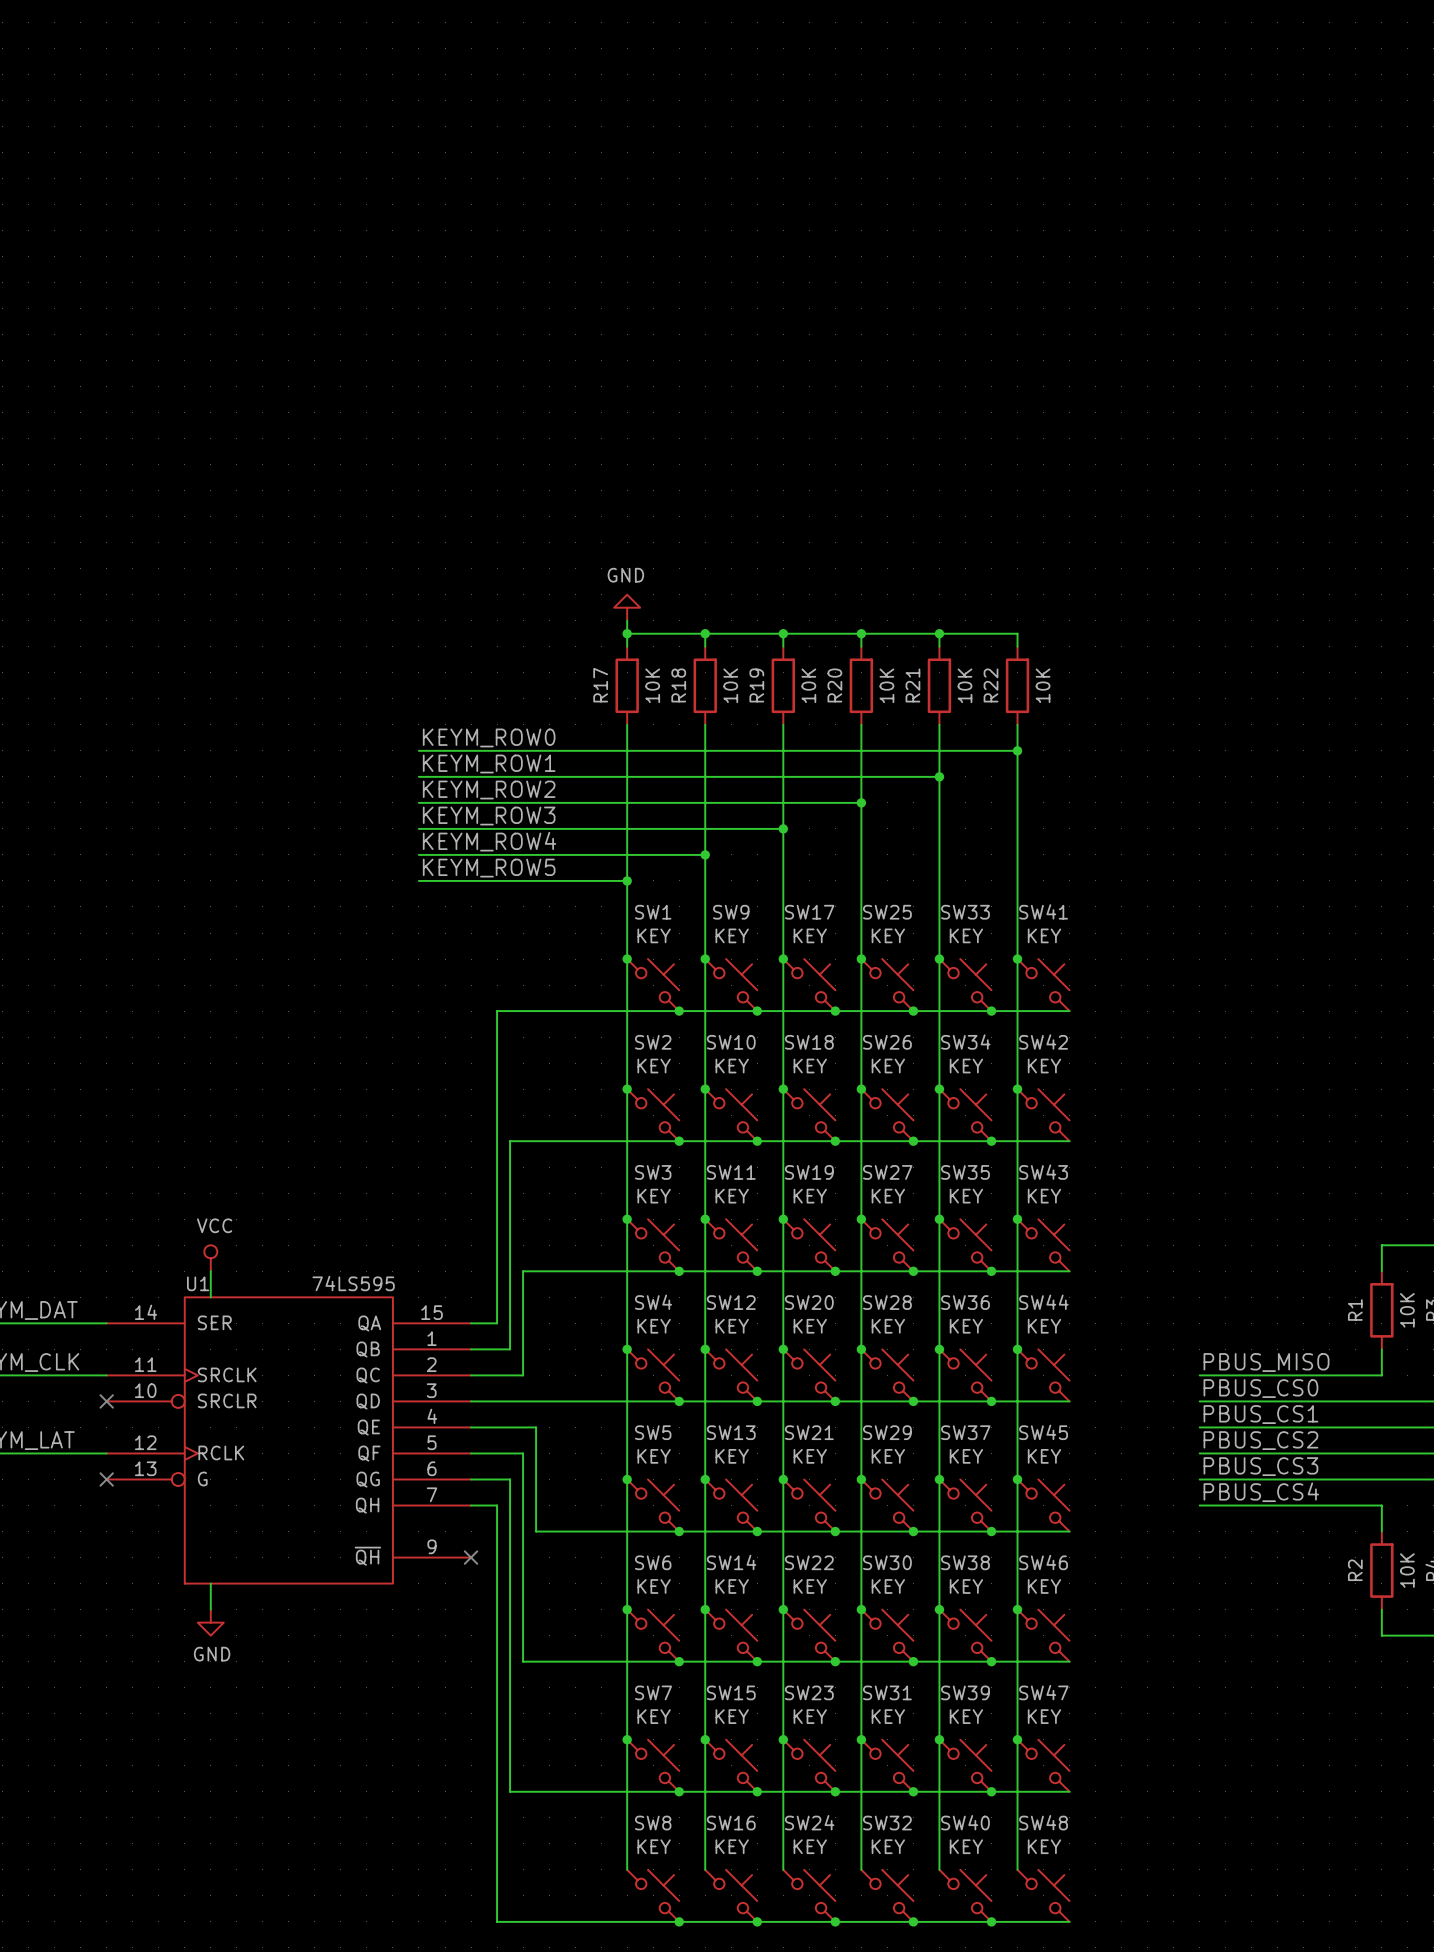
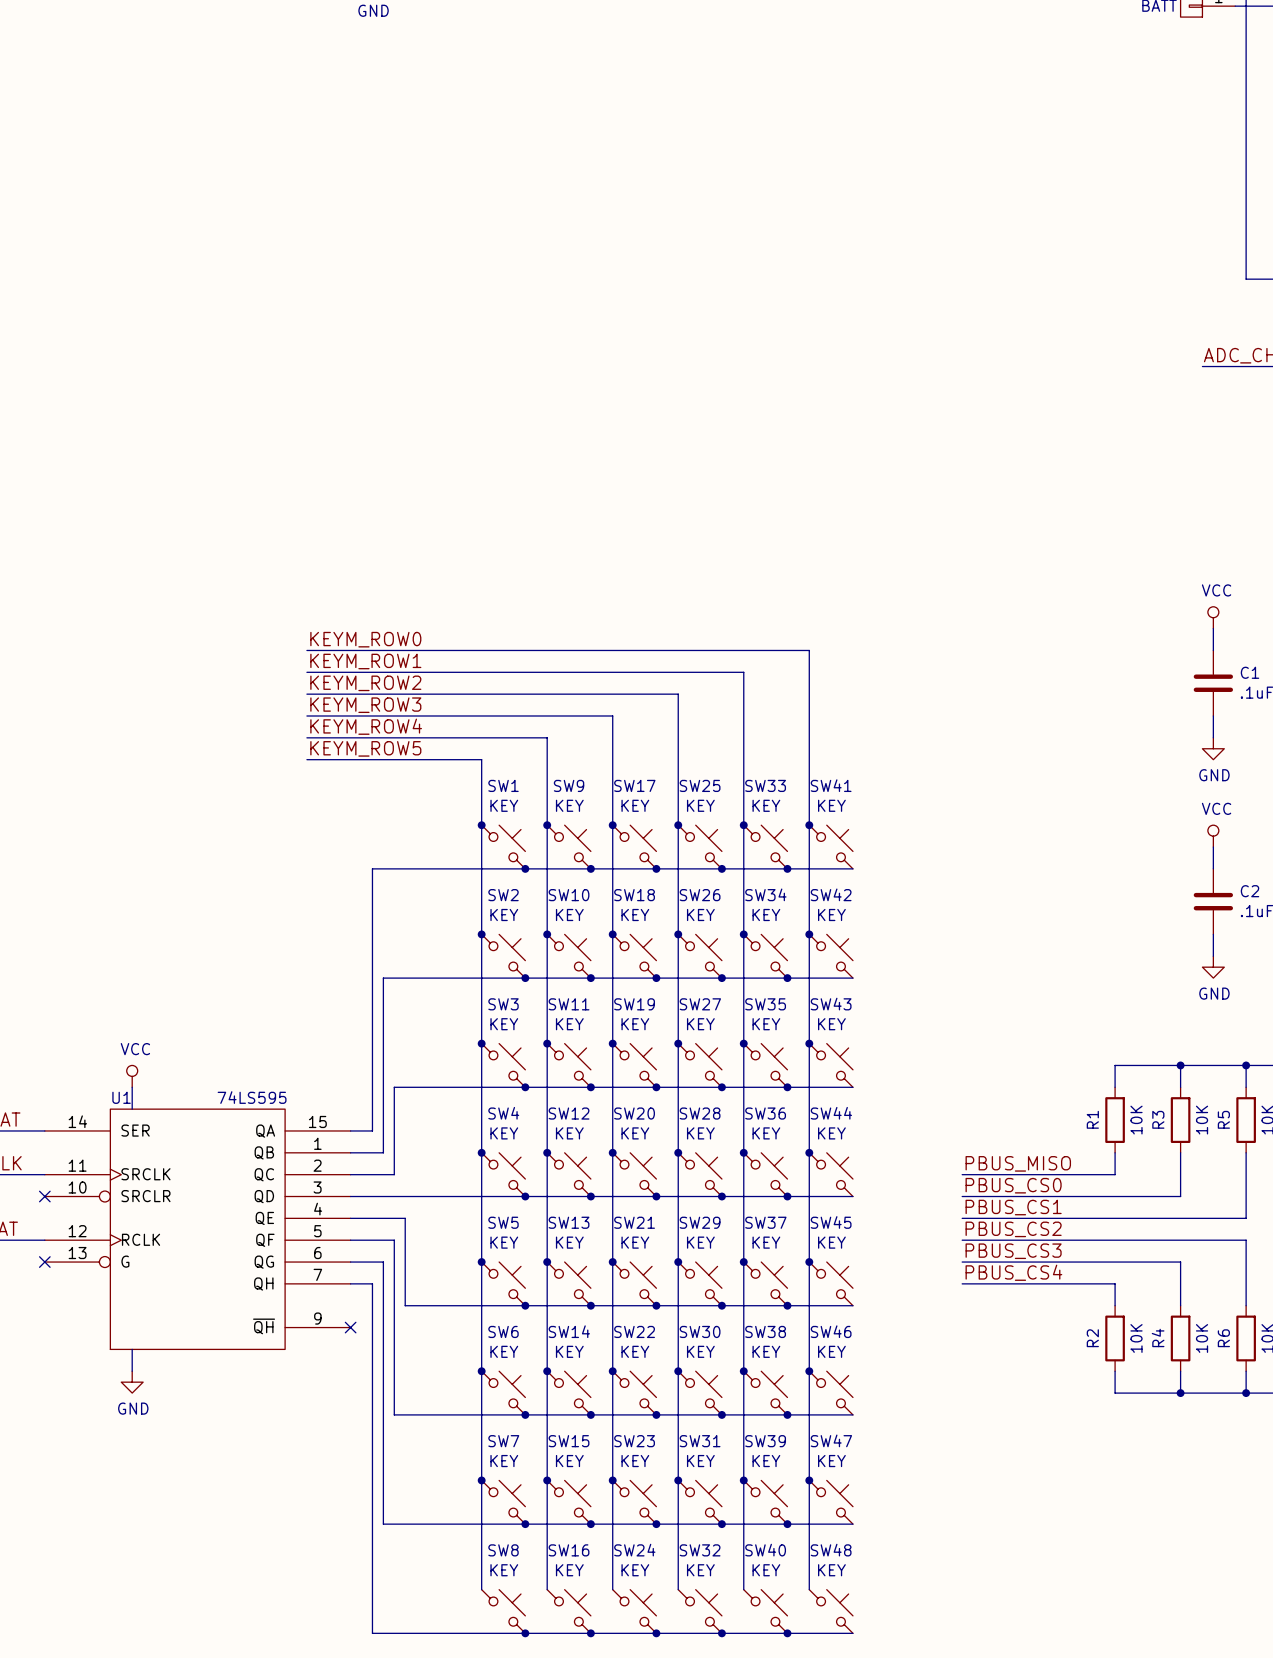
power symbol: GND (627, 607) -> none
wire: (627, 620) (627, 646) -> none
wire: (627, 633) (1017, 633) (1017, 646) -> none
junction: (627, 633) -> none
wire: (705, 633) (705, 646) -> none
junction: (705, 633) -> none
wire: (783, 633) (783, 646) -> none
junction: (783, 633) -> none
wire: (861, 633) (861, 646) -> none
junction: (861, 633) -> none
wire: (939, 633) (939, 646) -> none
junction: (939, 633) -> none
R17: 10K (627, 685) -> none
R18: 10K (705, 685) -> none
R19: 10K (783, 685) -> none
R20: 10K (861, 685) -> none
R21: 10K (939, 685) -> none
R22: 10K (1017, 685) -> none
wire: (627, 724) (627, 880) -> none
wire: (705, 724) (705, 854) -> none
wire: (783, 724) (783, 828) -> none
wire: (861, 724) (861, 802) -> none
wire: (939, 724) (939, 776) -> none
wire: (1017, 724) (1017, 750) -> none
junction: (1017, 750) -> none
junction: (939, 776) -> none
junction: (861, 802) -> none
junction: (783, 828) -> none
junction: (705, 854) -> none
junction: (627, 880) -> none

